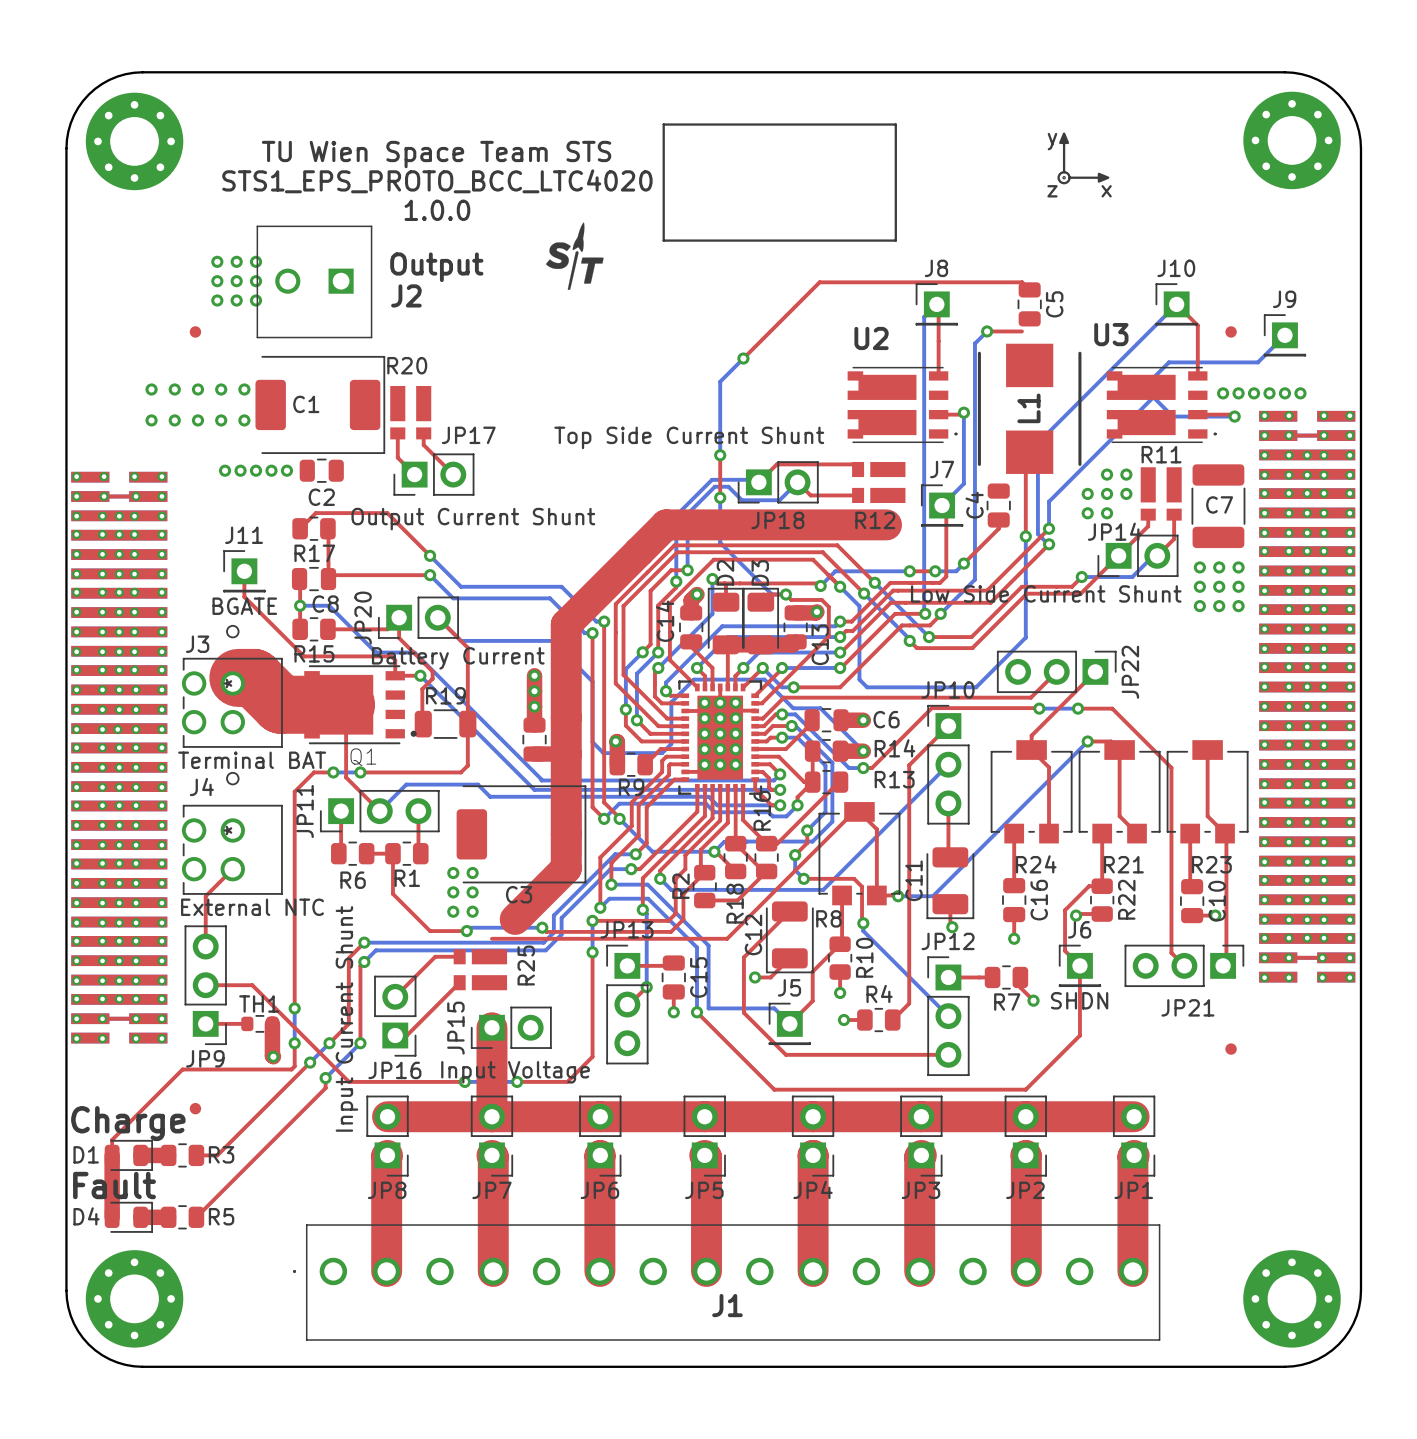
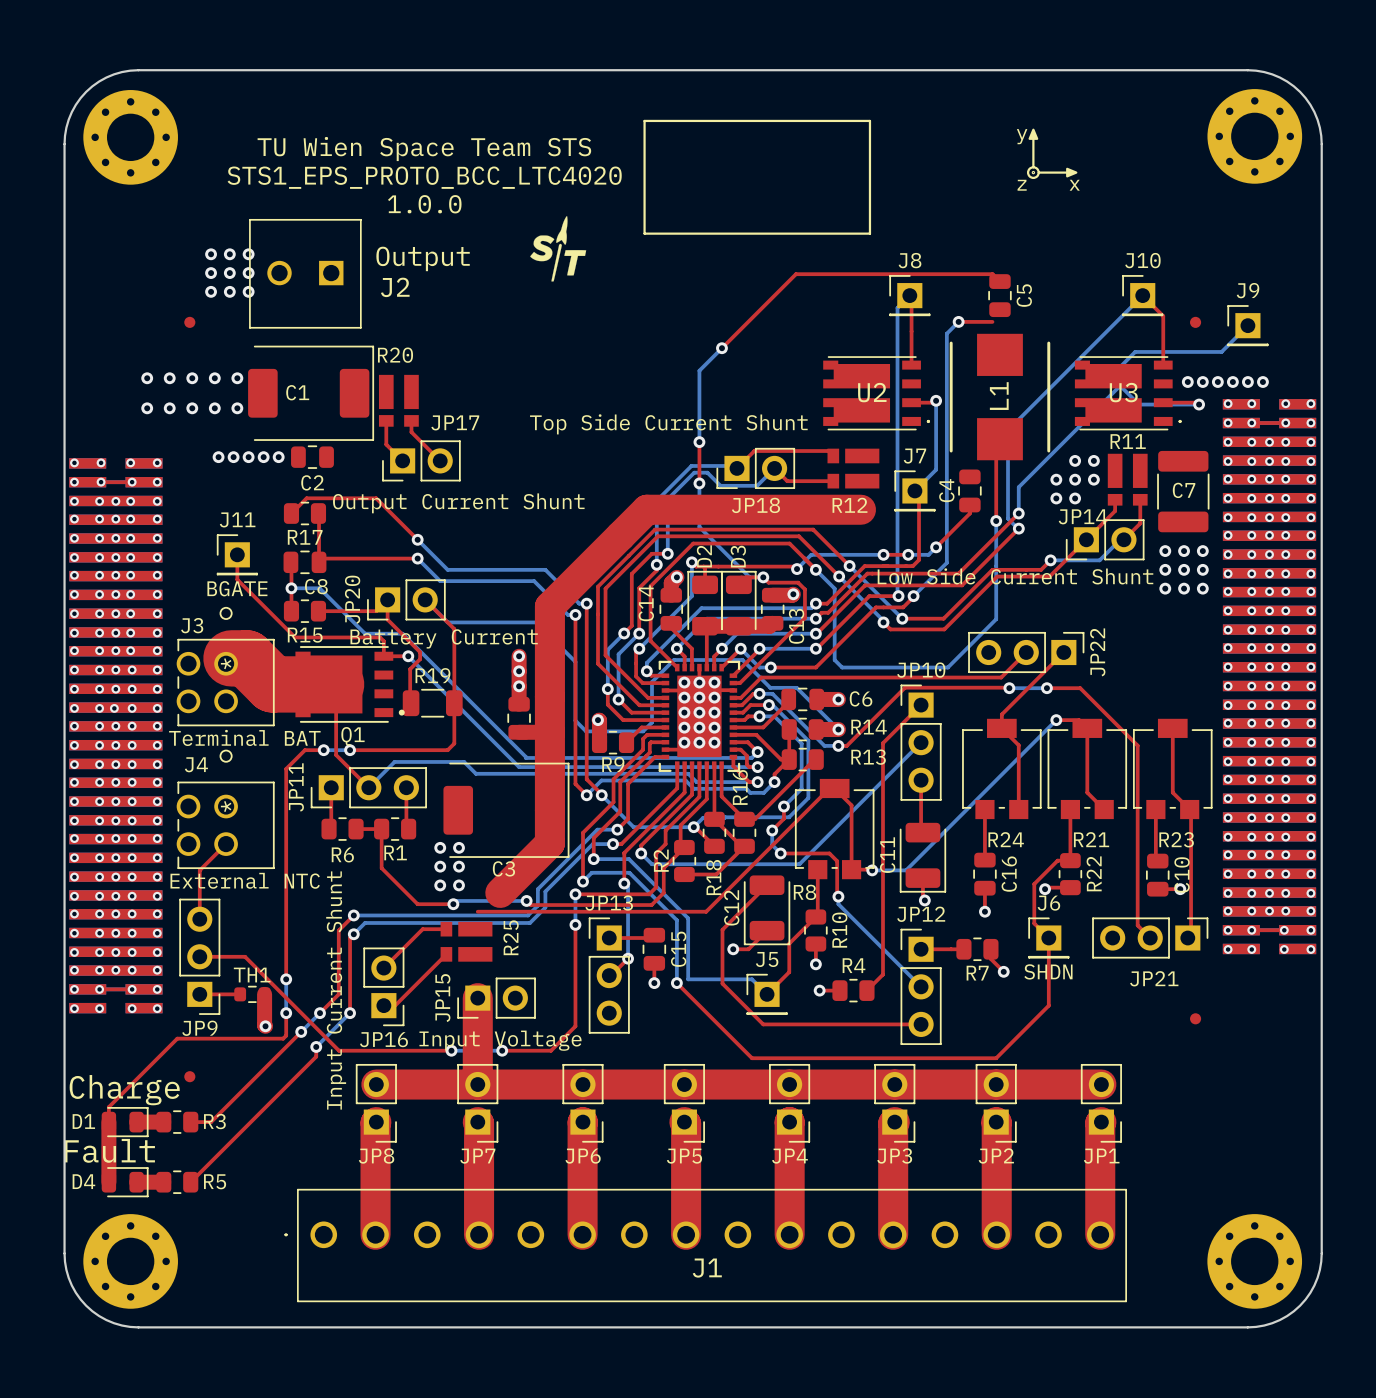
U3 name position: U3 (1111, 334) -> U3 (1123, 392)
U2 name position: U2 (871, 338) -> U2 (872, 392)

